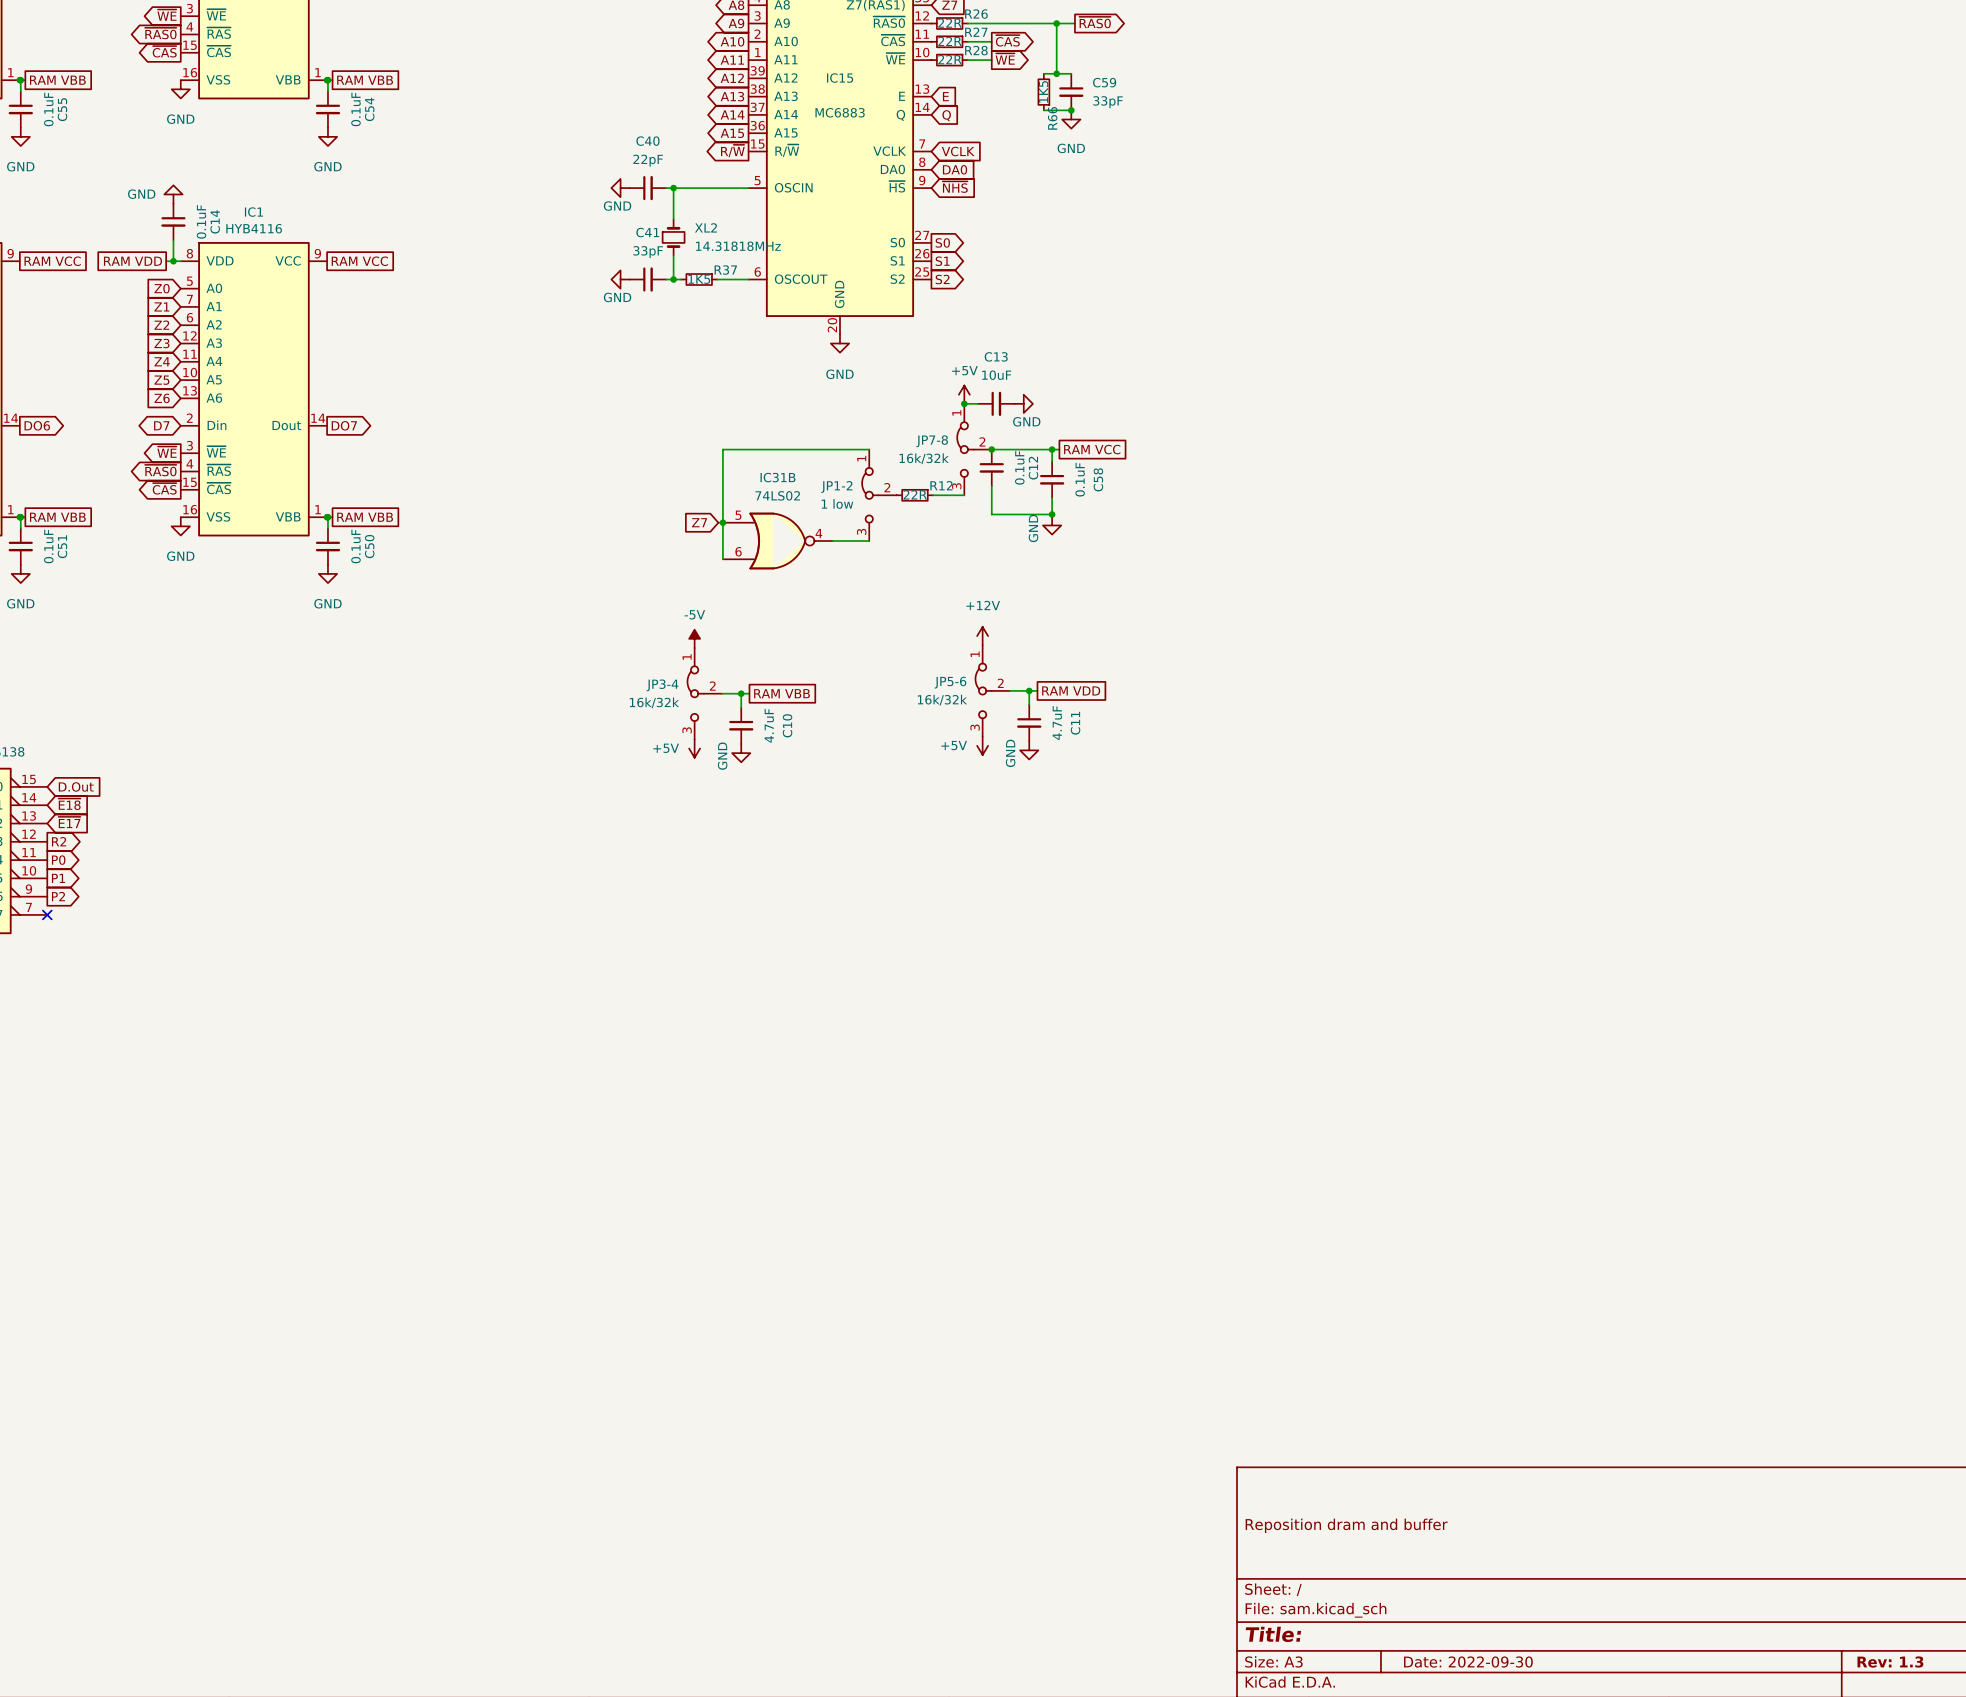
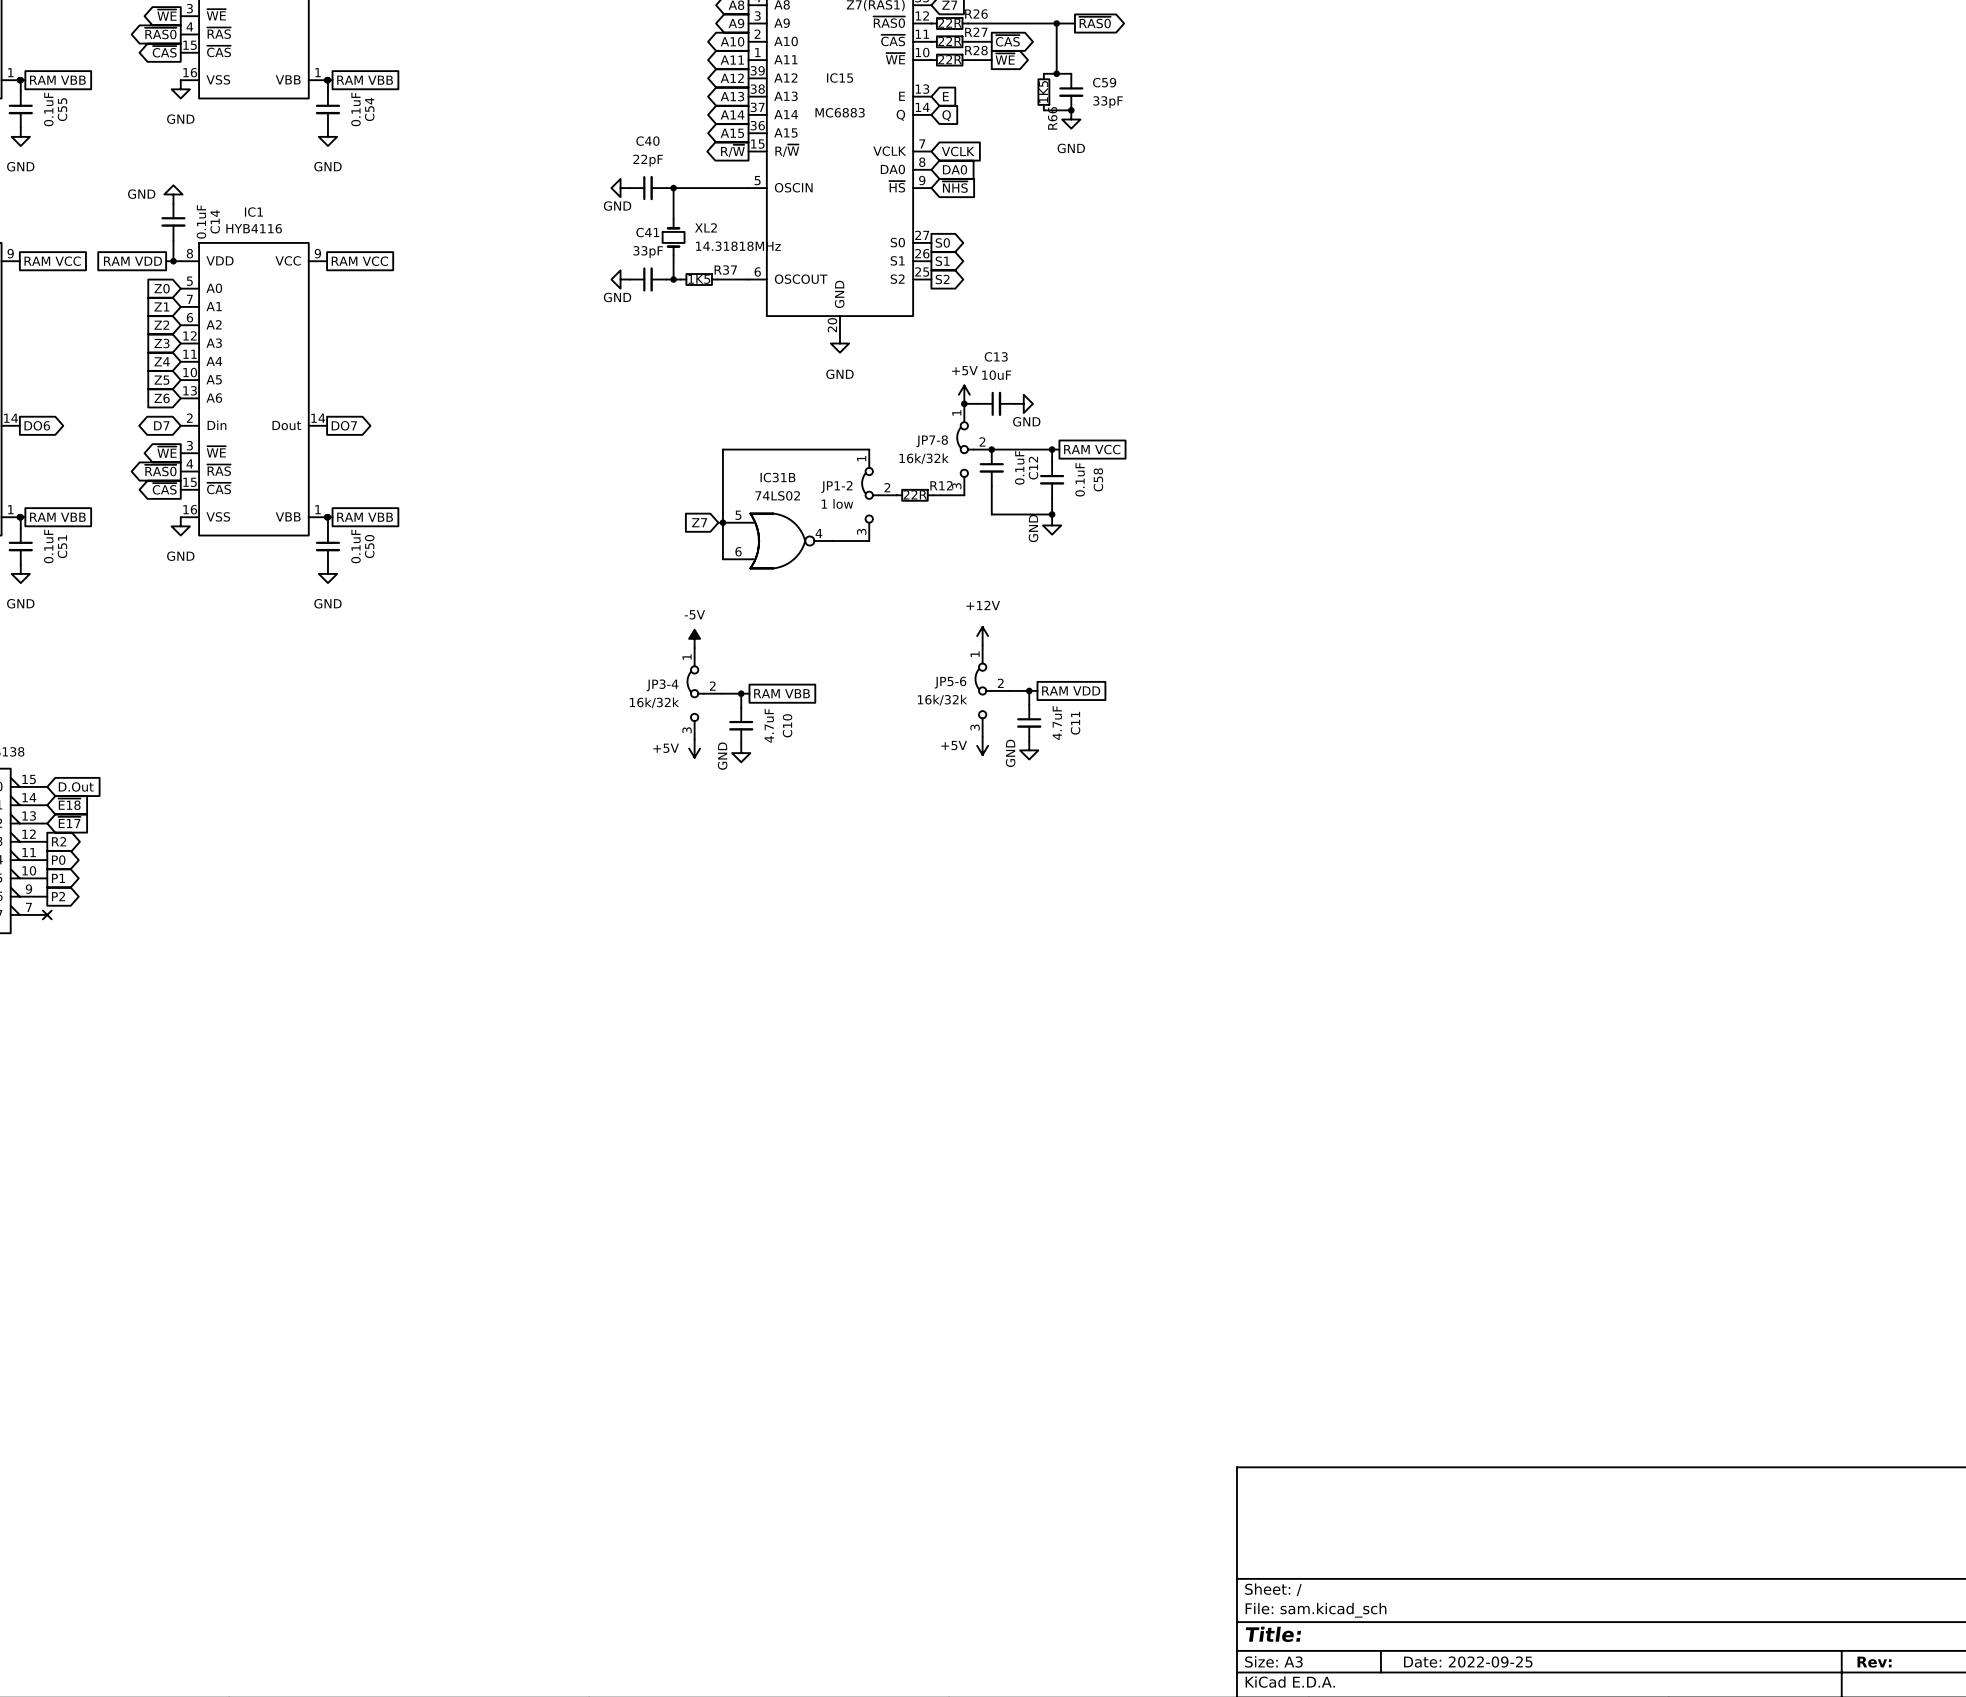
title block: Reposition dram and buffer (1346, 1525) -> none
title block: Date: 2022-09-30 (1468, 1662) -> Date: 2022-09-25 (1468, 1662)
title block: Rev: 1.3 (1890, 1662) -> Rev: (1874, 1662)

